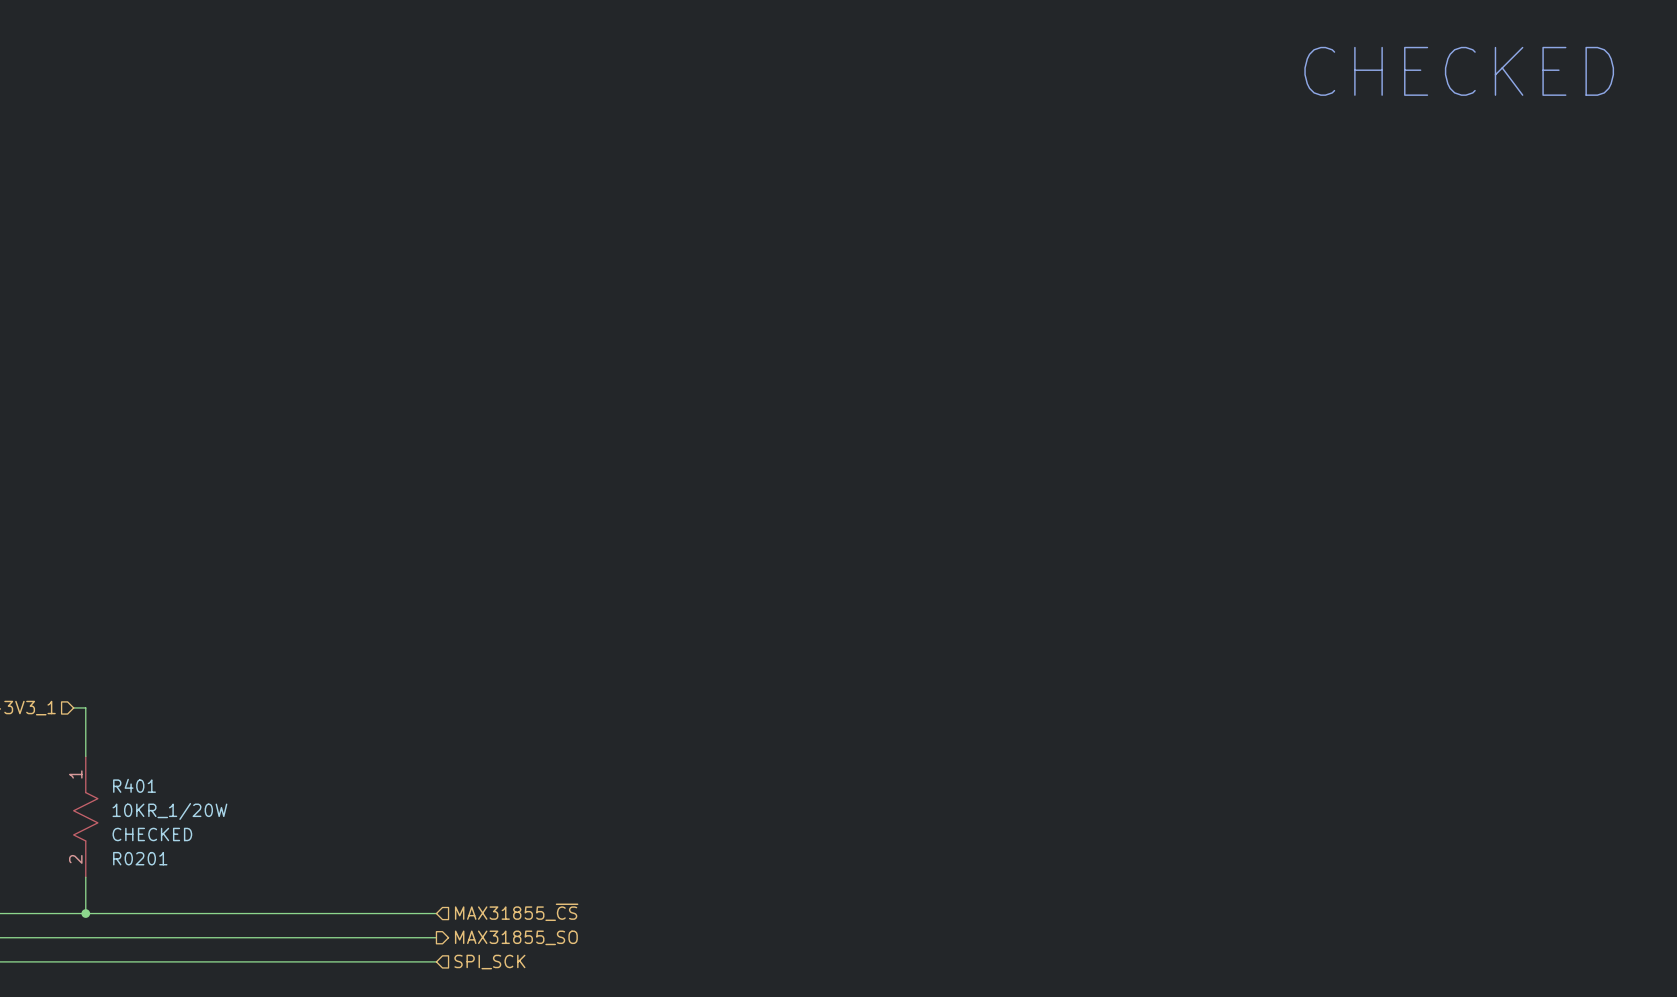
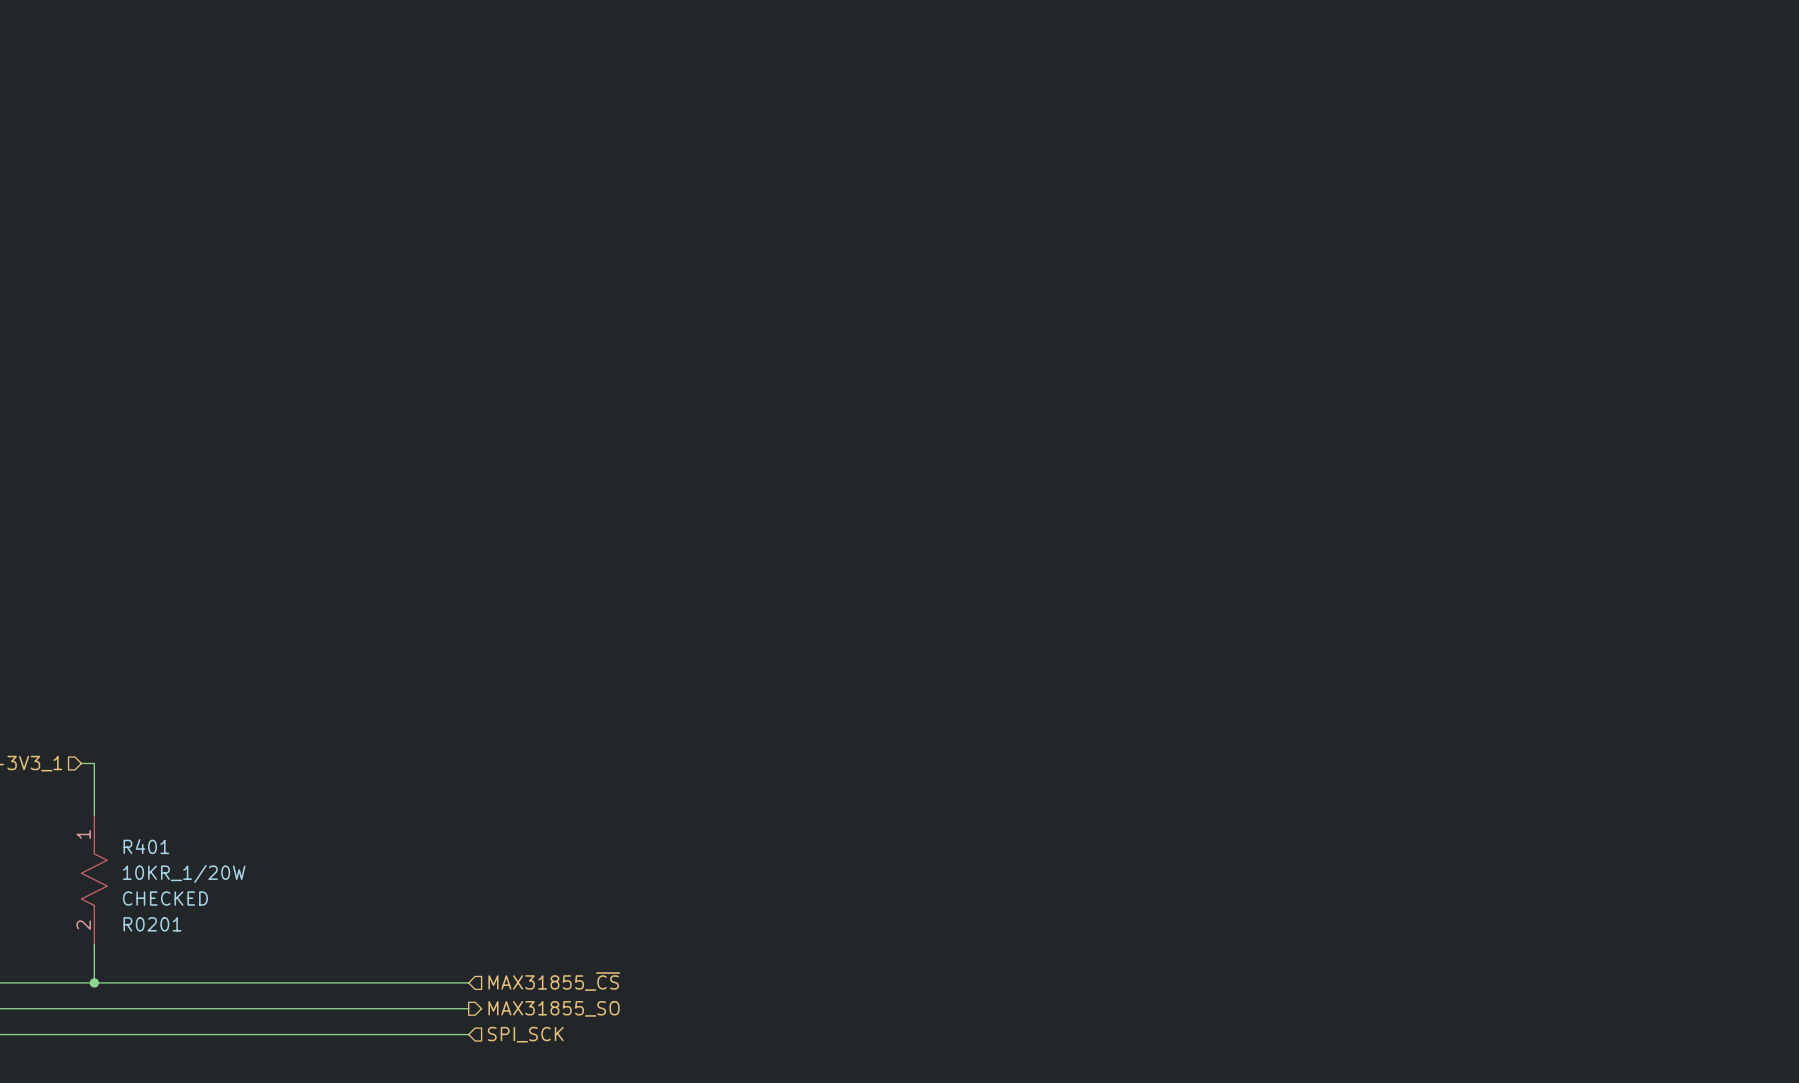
text: CHECKED (1459, 71) -> none

